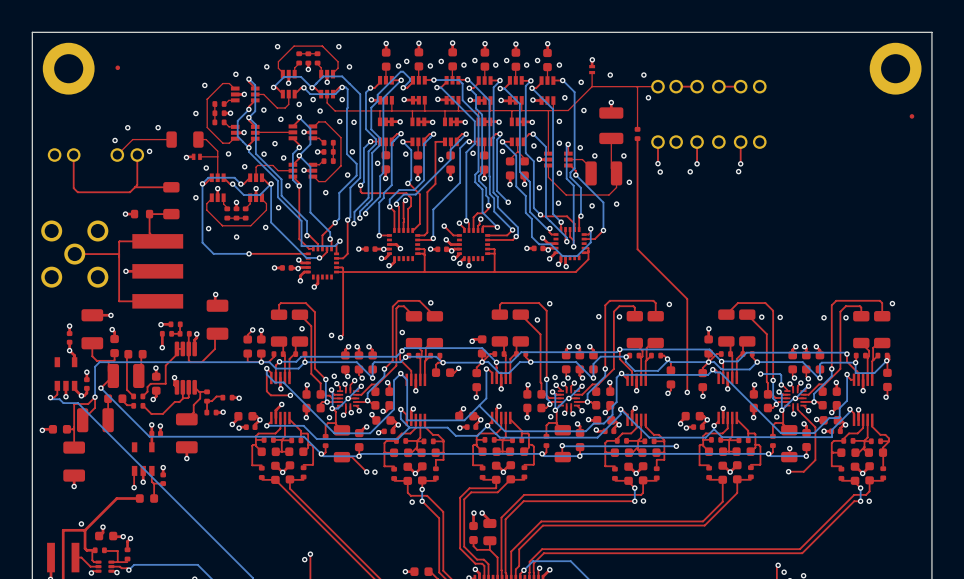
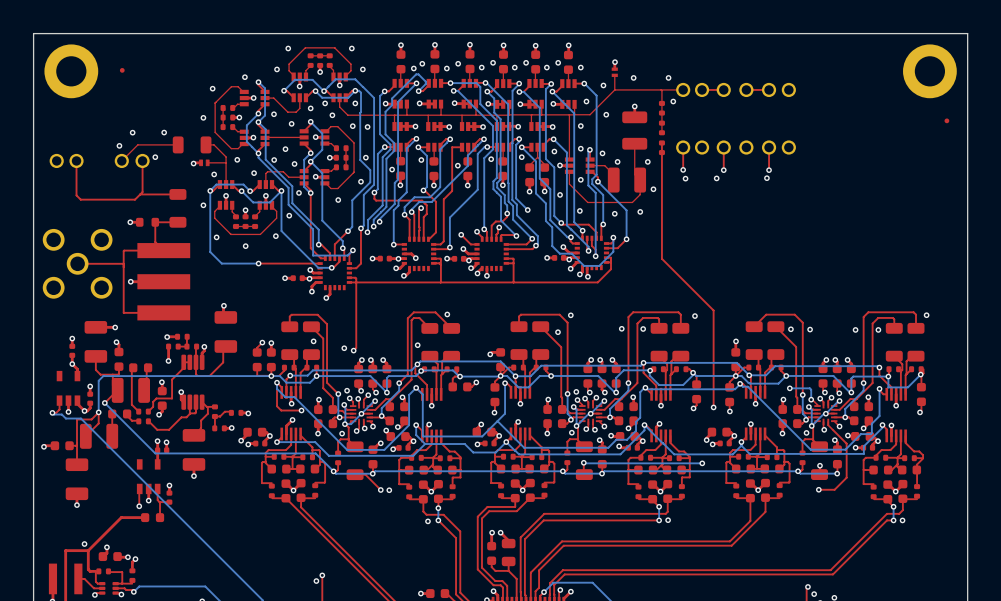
part: none -> (661, 108)
part: none -> (661, 127)
part: (637, 133) -> none
part: none -> (661, 147)

